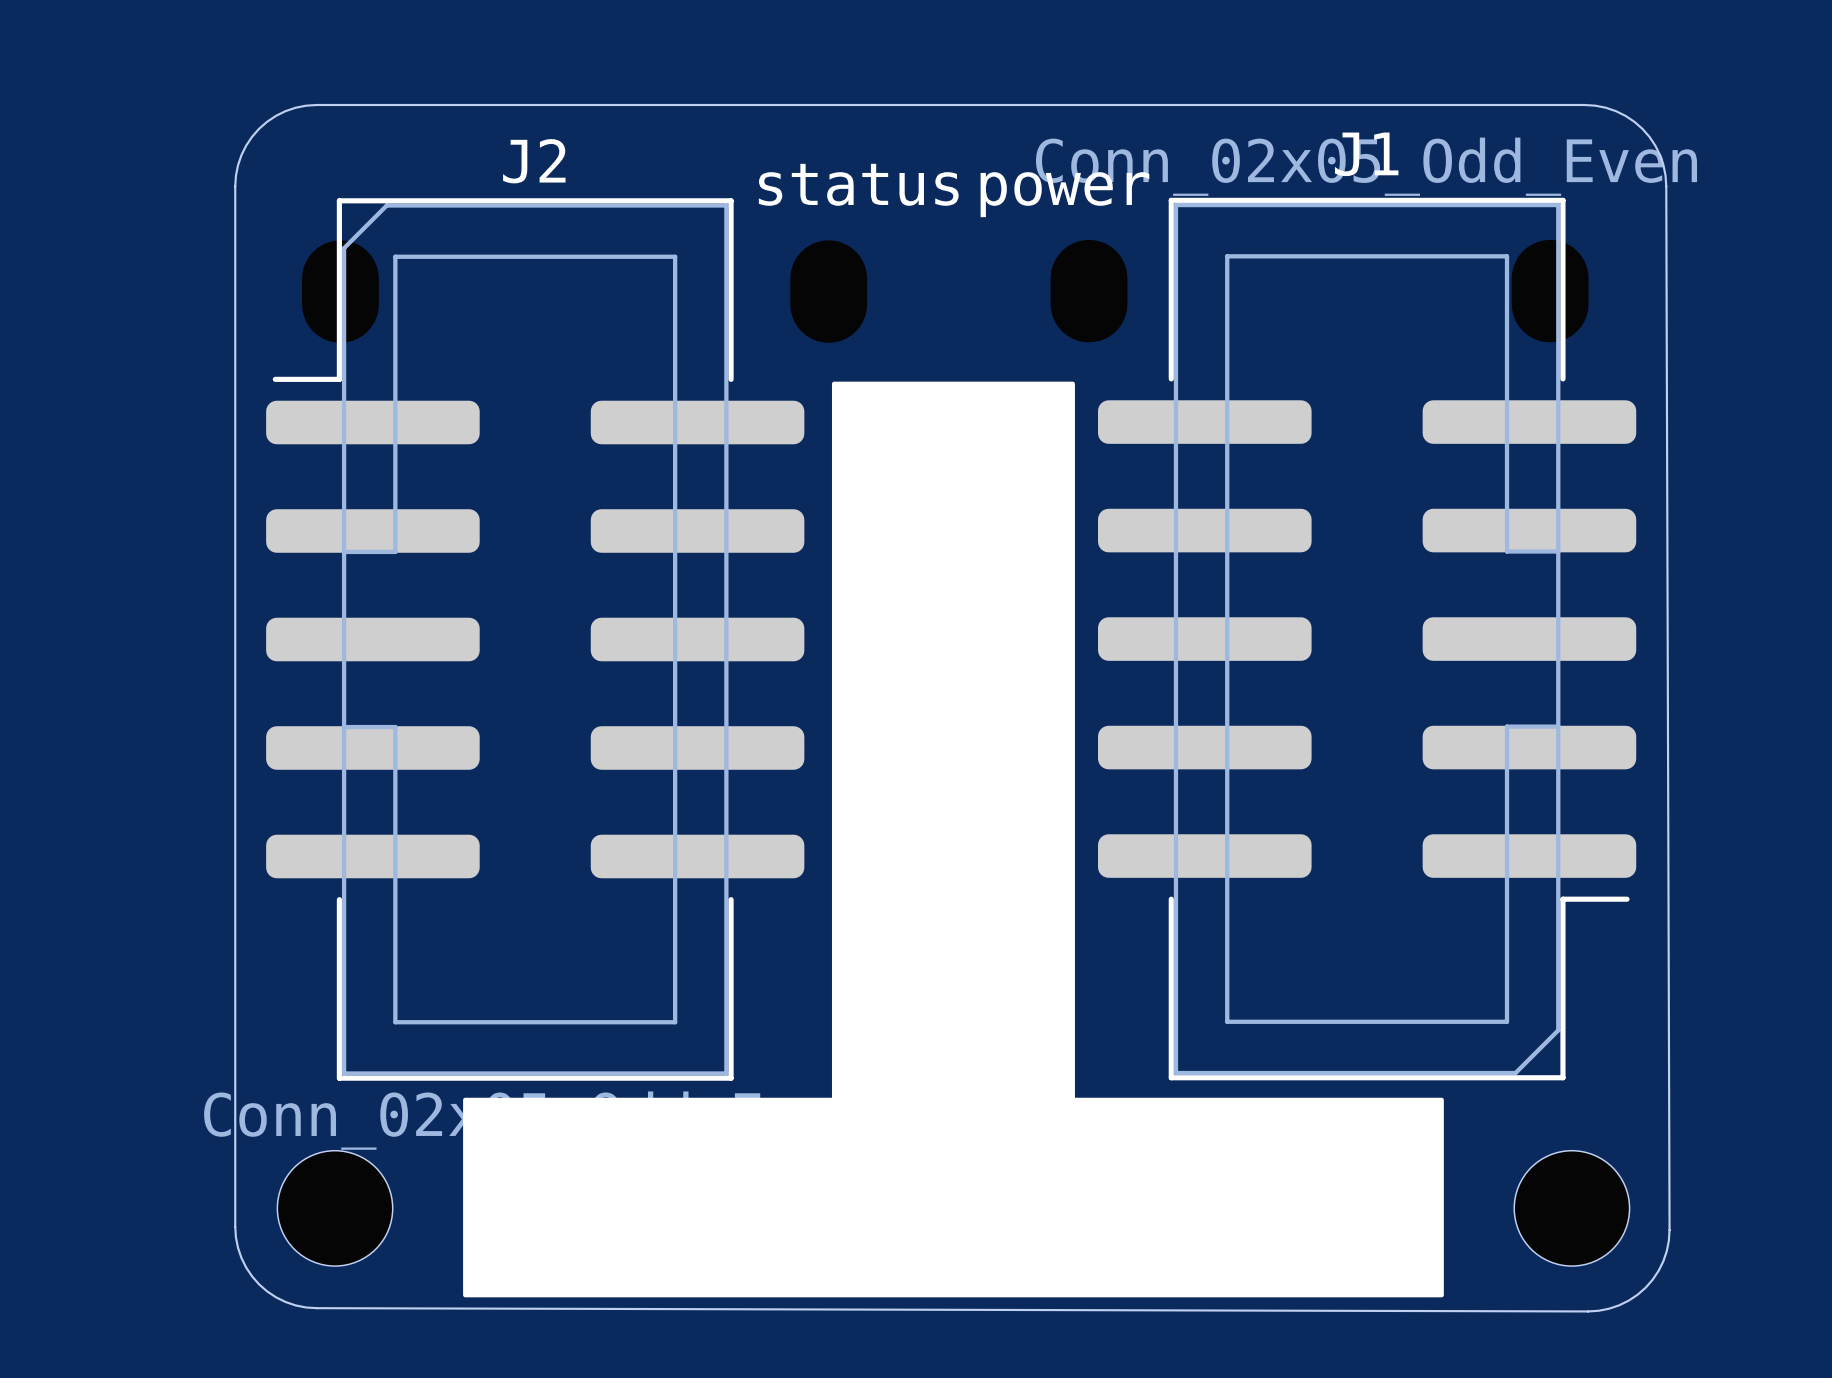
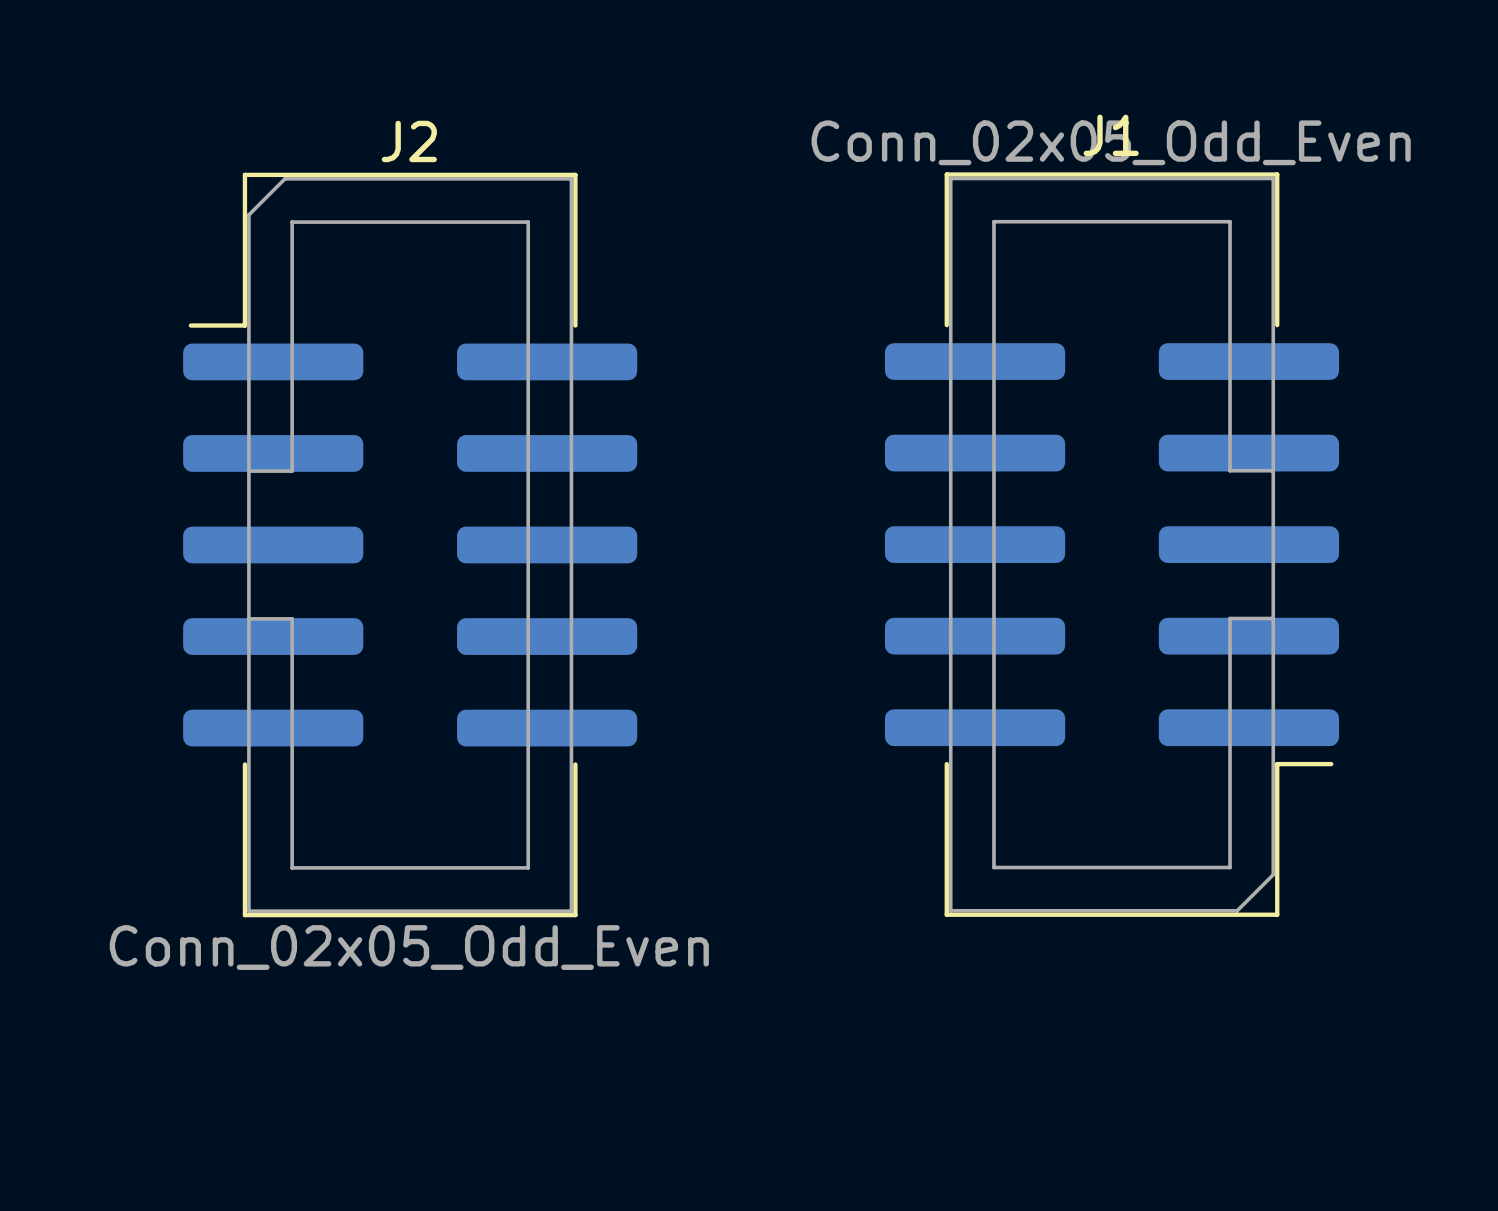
board edge: (1584, 104) (316, 104) (285, 111) (259, 128) (241, 155) (235, 186) (235, 1226) (241, 1257) (259, 1284) (285, 1301) (316, 1308) (1588, 1311) (1619, 1305) (1645, 1287) (1663, 1261) (1669, 1230) (1666, 186) (1660, 155) (1642, 128) (1616, 111) (1584, 104) -> none
text: status (858, 184) -> none
text: power (1064, 194) -> none
drawing: [463, 381, 1444, 1298] -> none
part: (335, 1208) -> none
part: (1571, 1208) -> none

